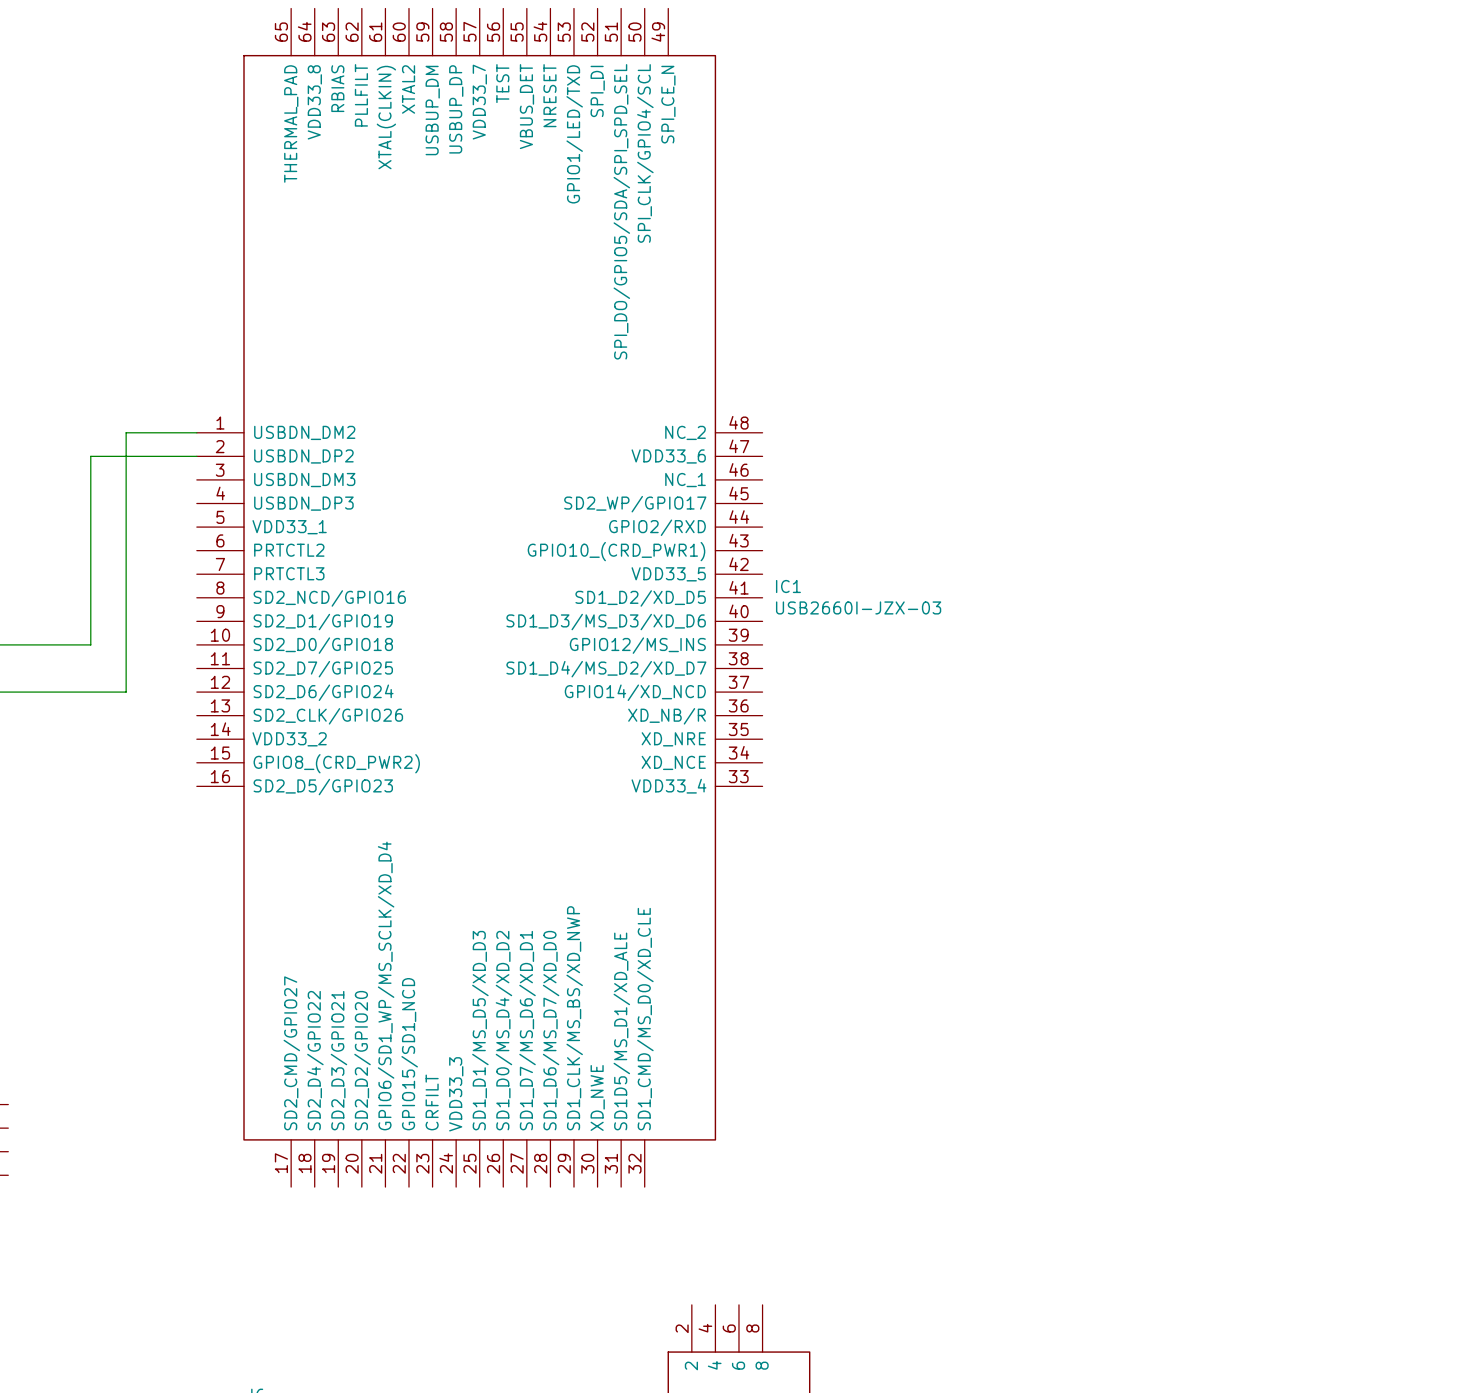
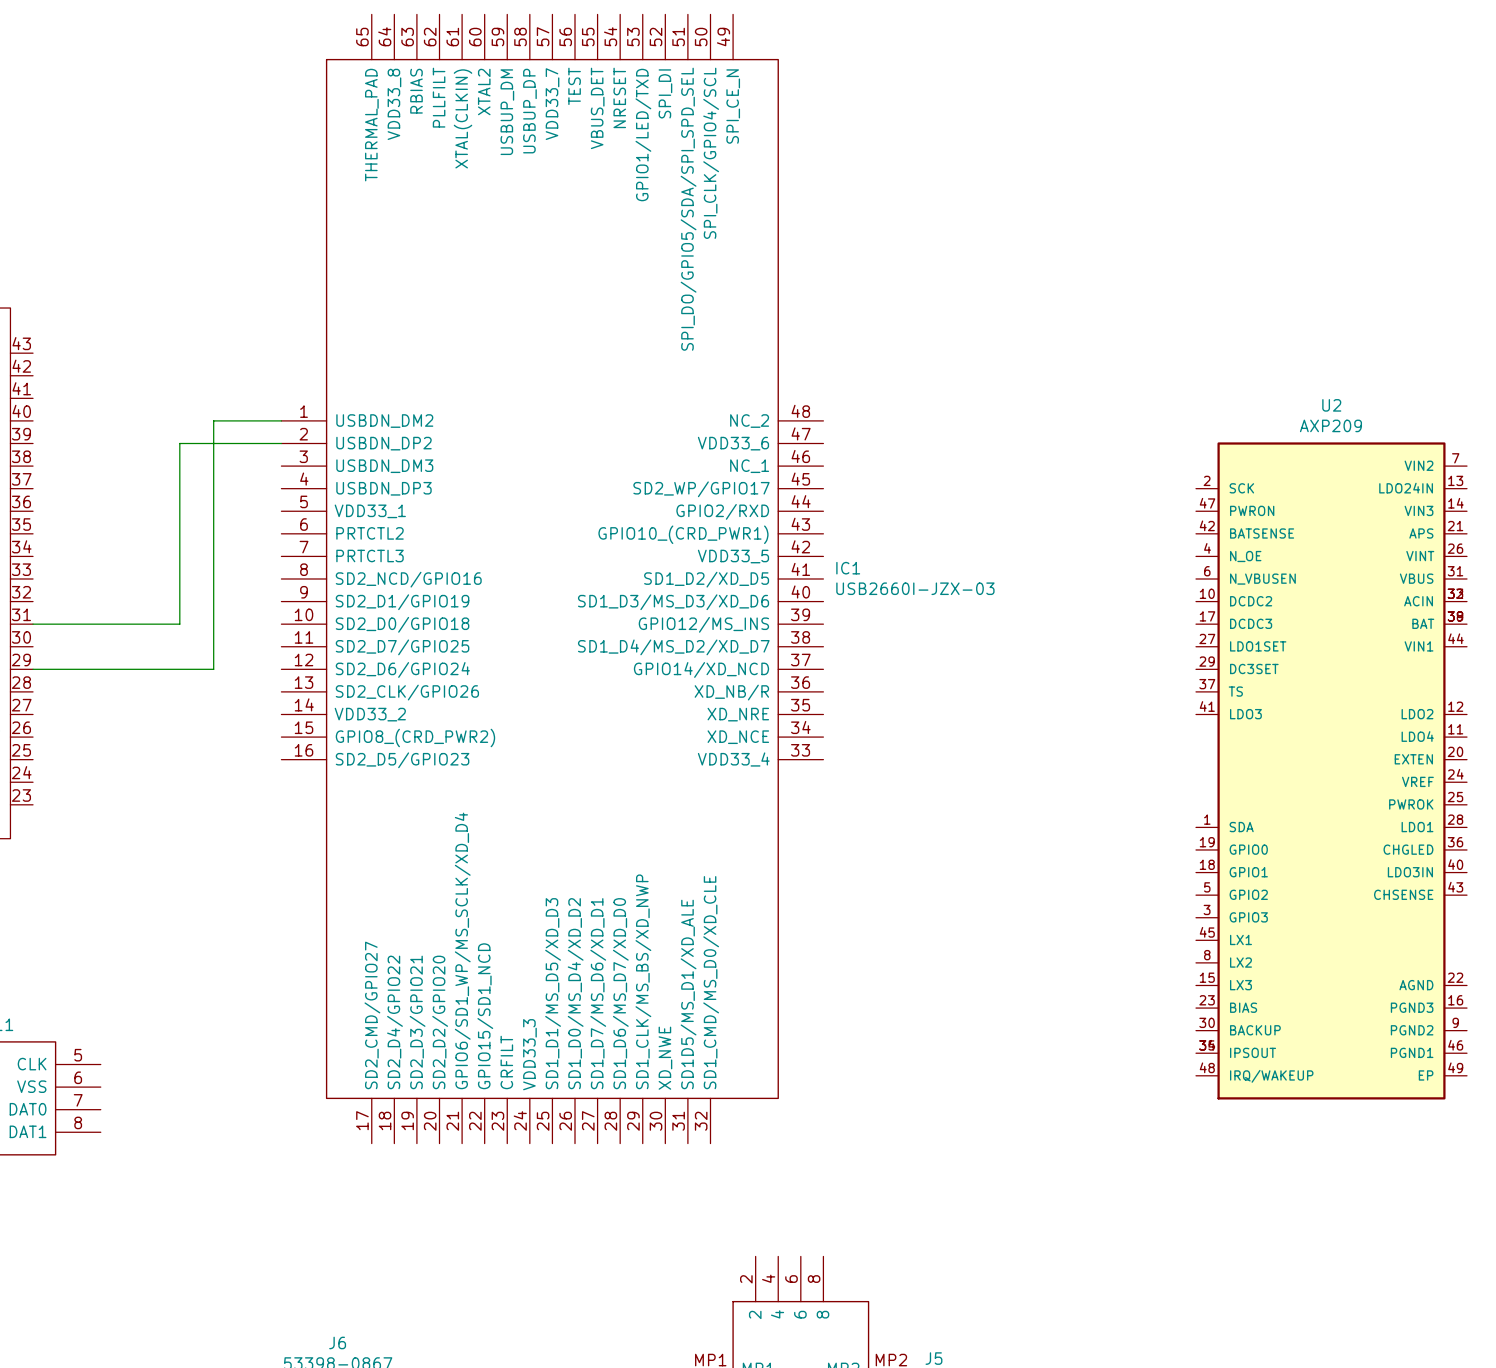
U2: none -> AXP209 (1331, 770)

